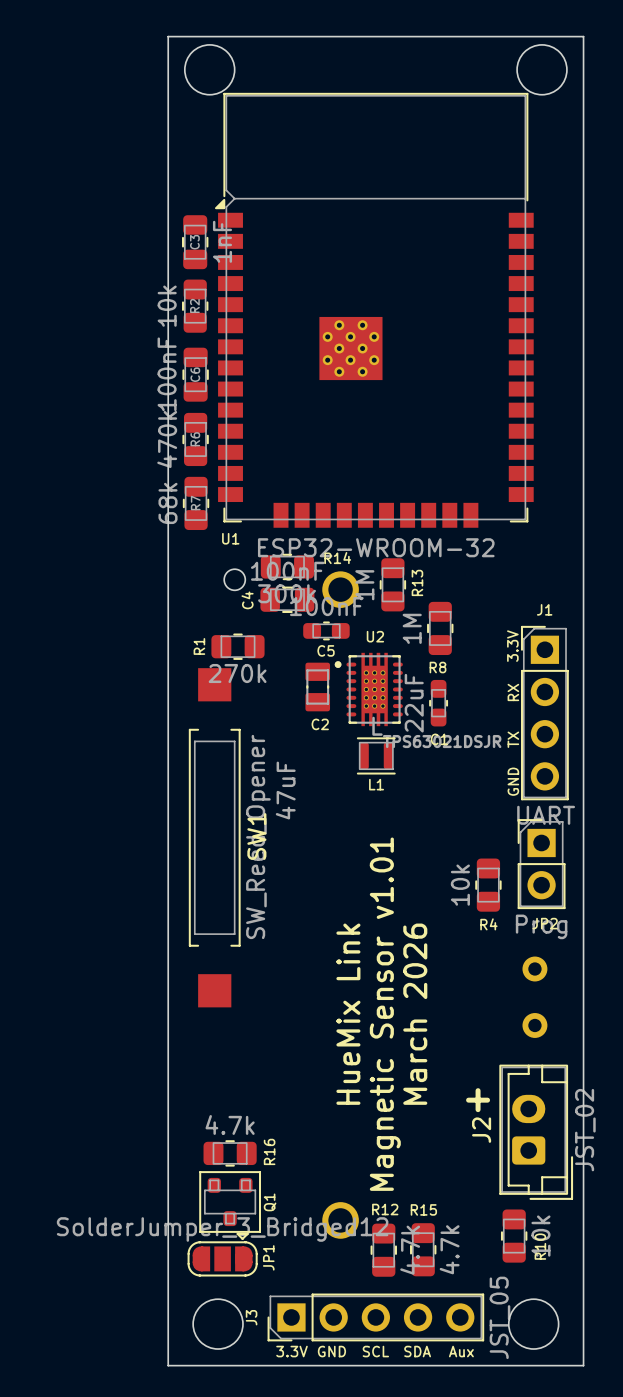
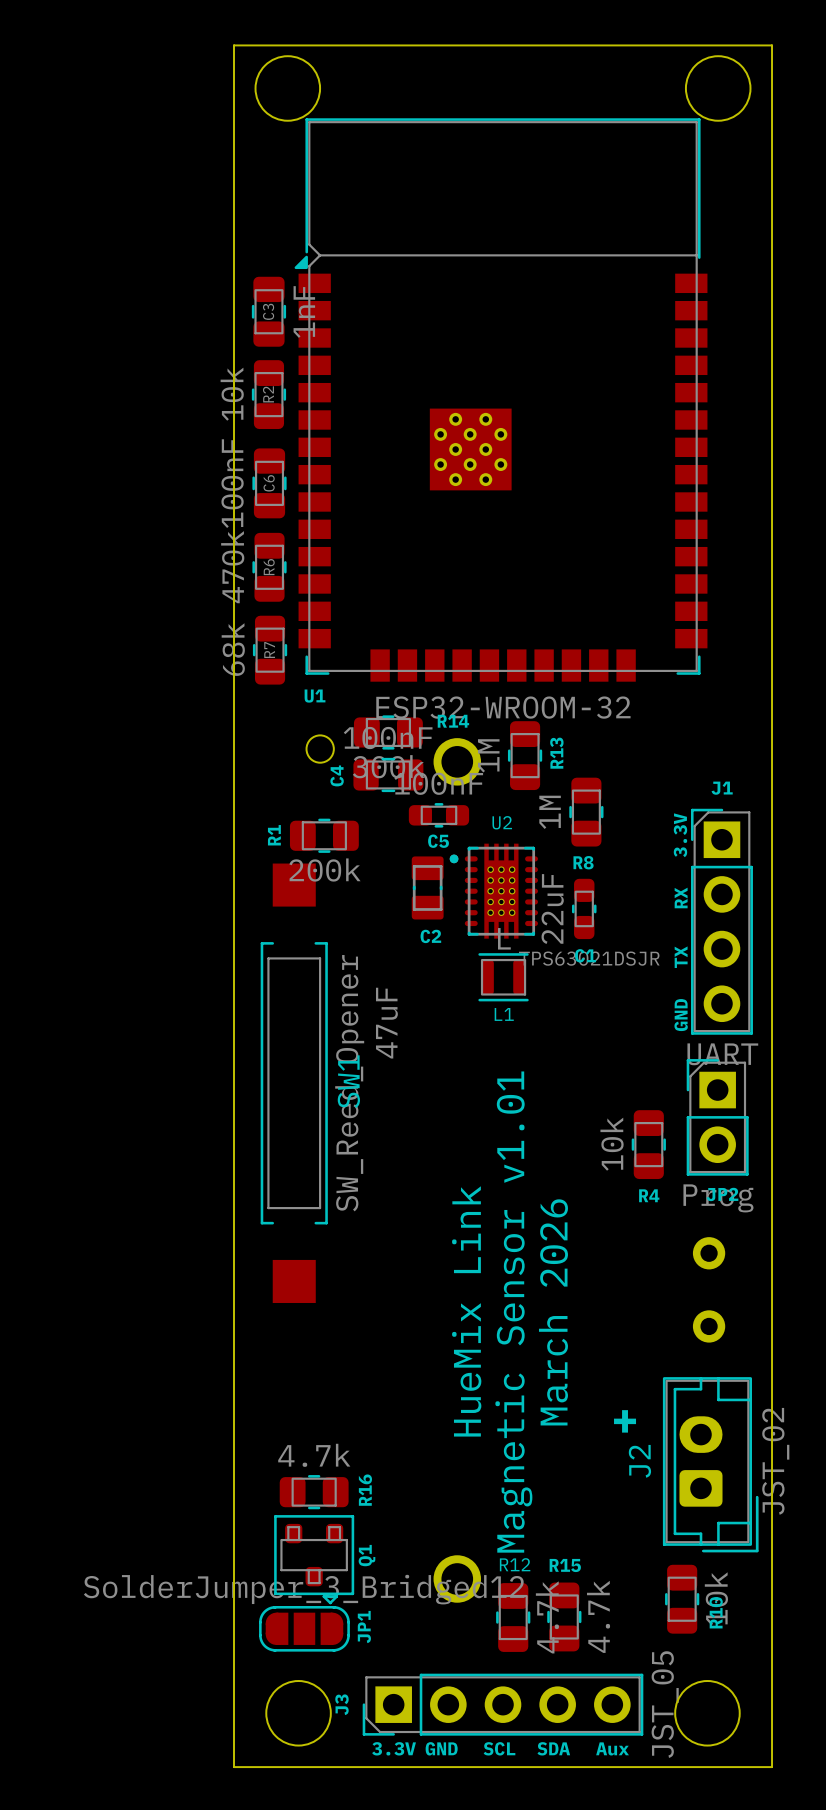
R1 value: 270k (237, 673) -> 200k (324, 870)

